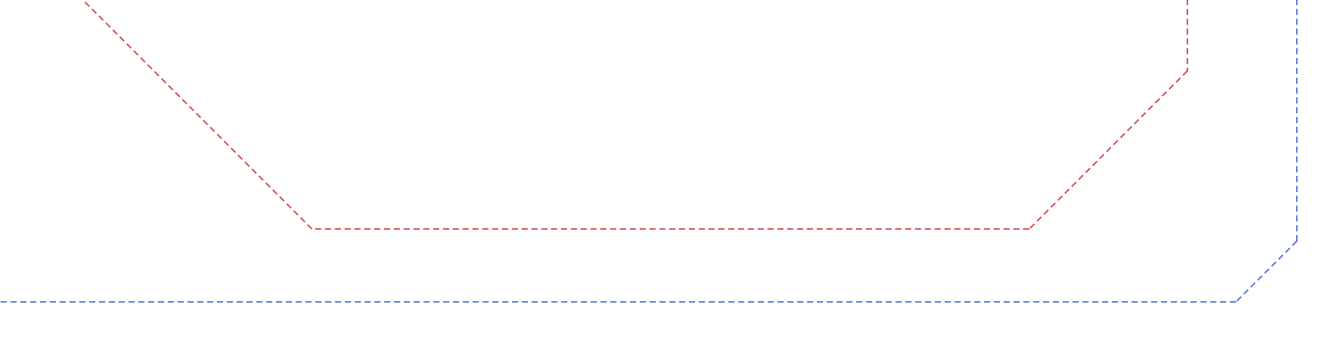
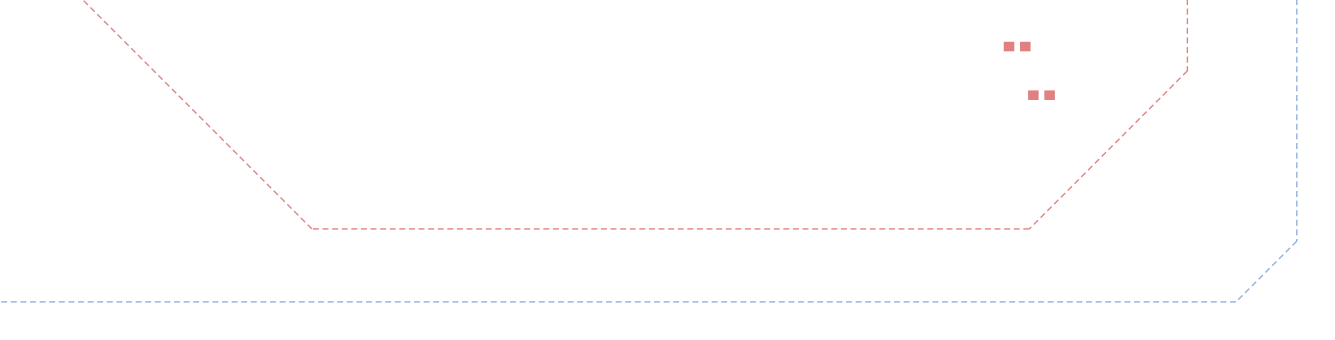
part: none -> (1017, 46)
part: none -> (1041, 95)

